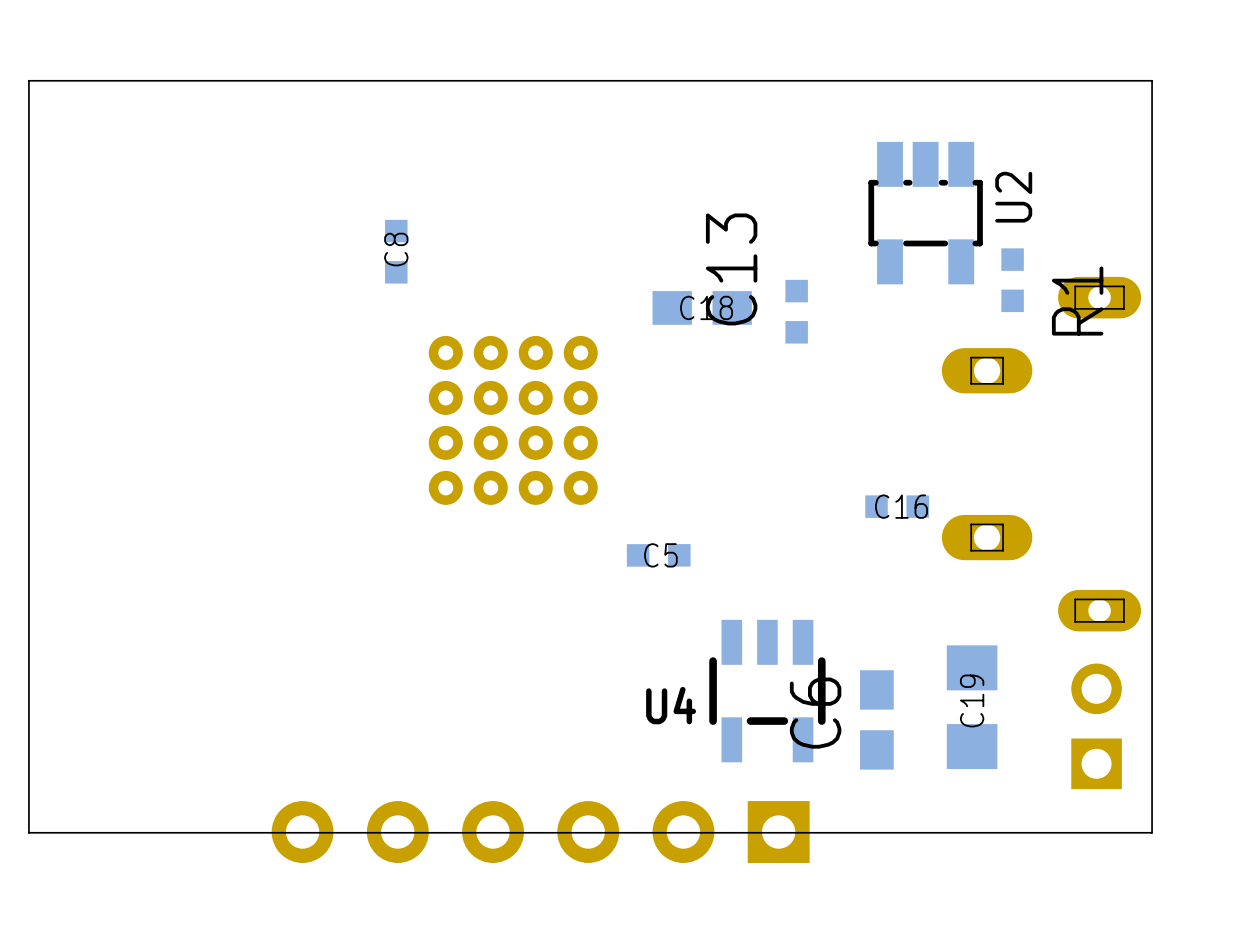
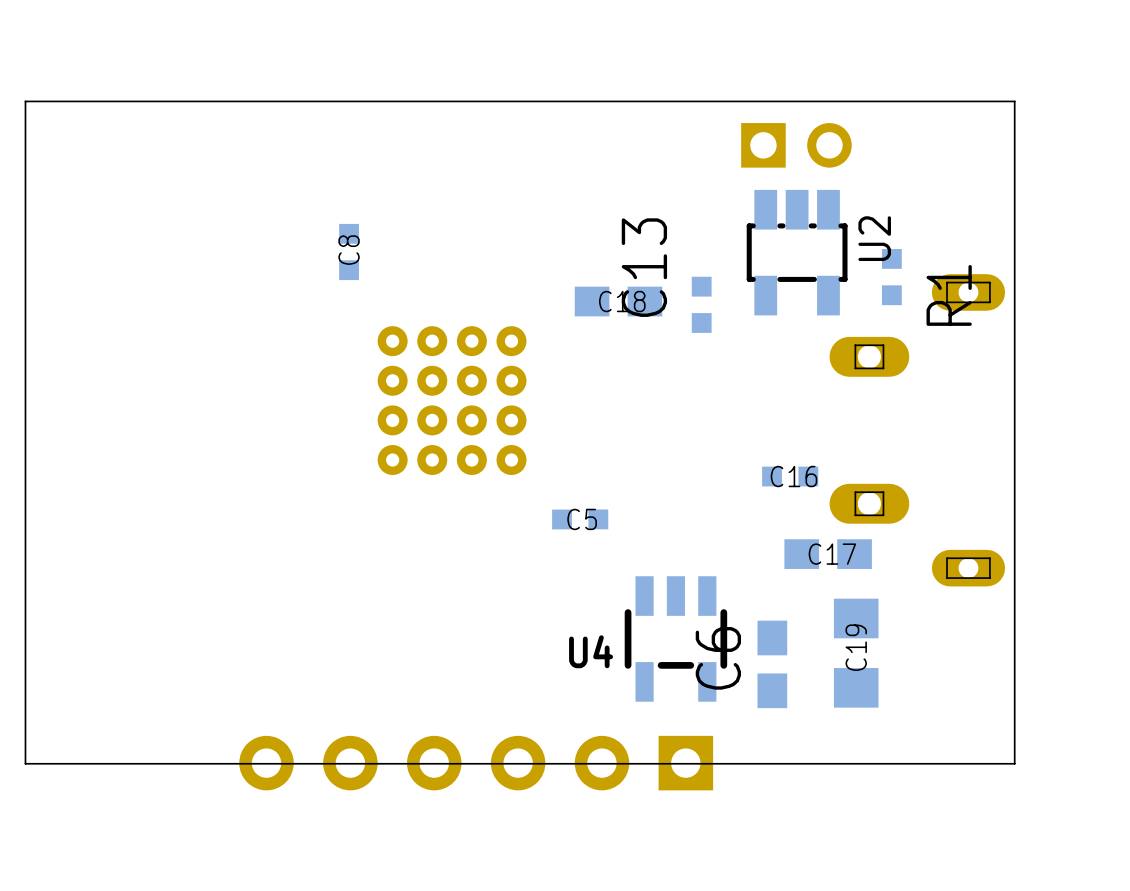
U2 position: (925, 213) -> (797, 252)
C17: none -> (828, 554)
part rotation: 0° (1096, 726) -> 90° clockwise (796, 145)
part position: (1096, 726) -> (796, 145)

